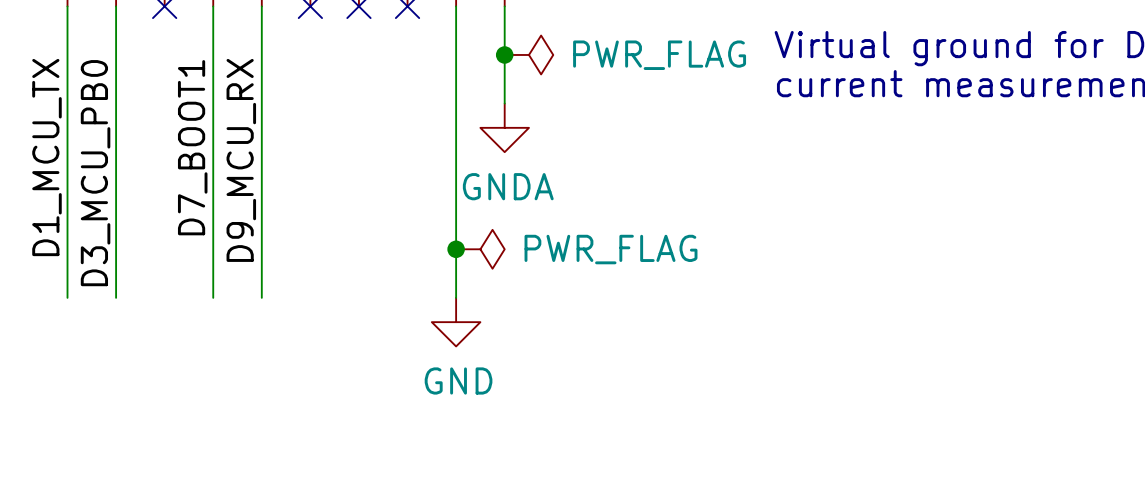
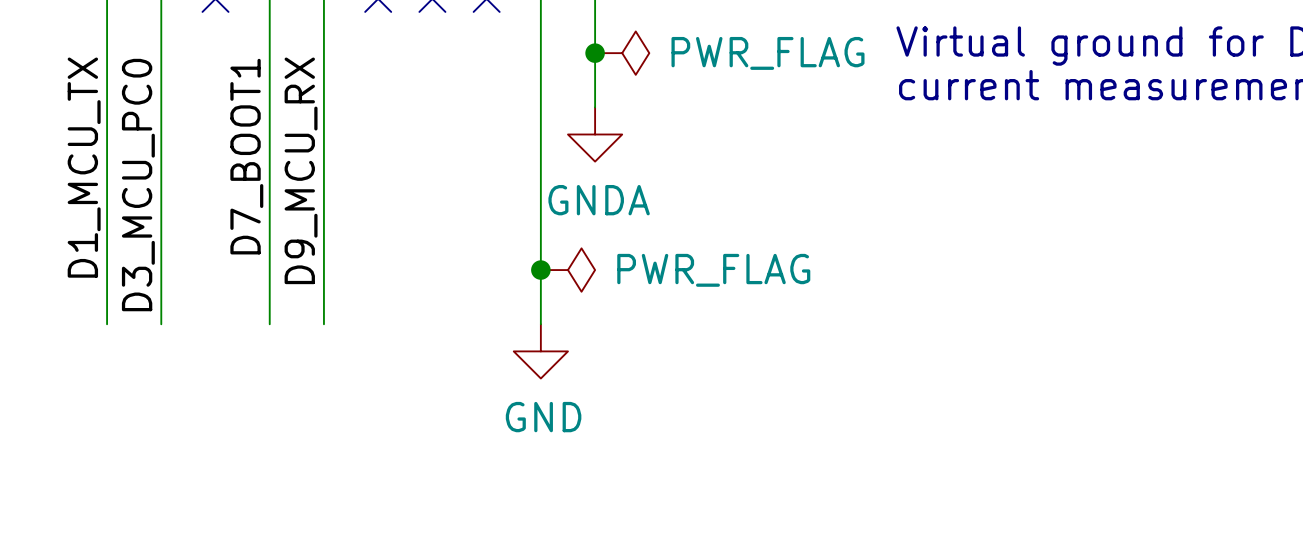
label: D3_MCU_PB0 (95, 173) -> D3_MCU_PC0 (138, 185)

